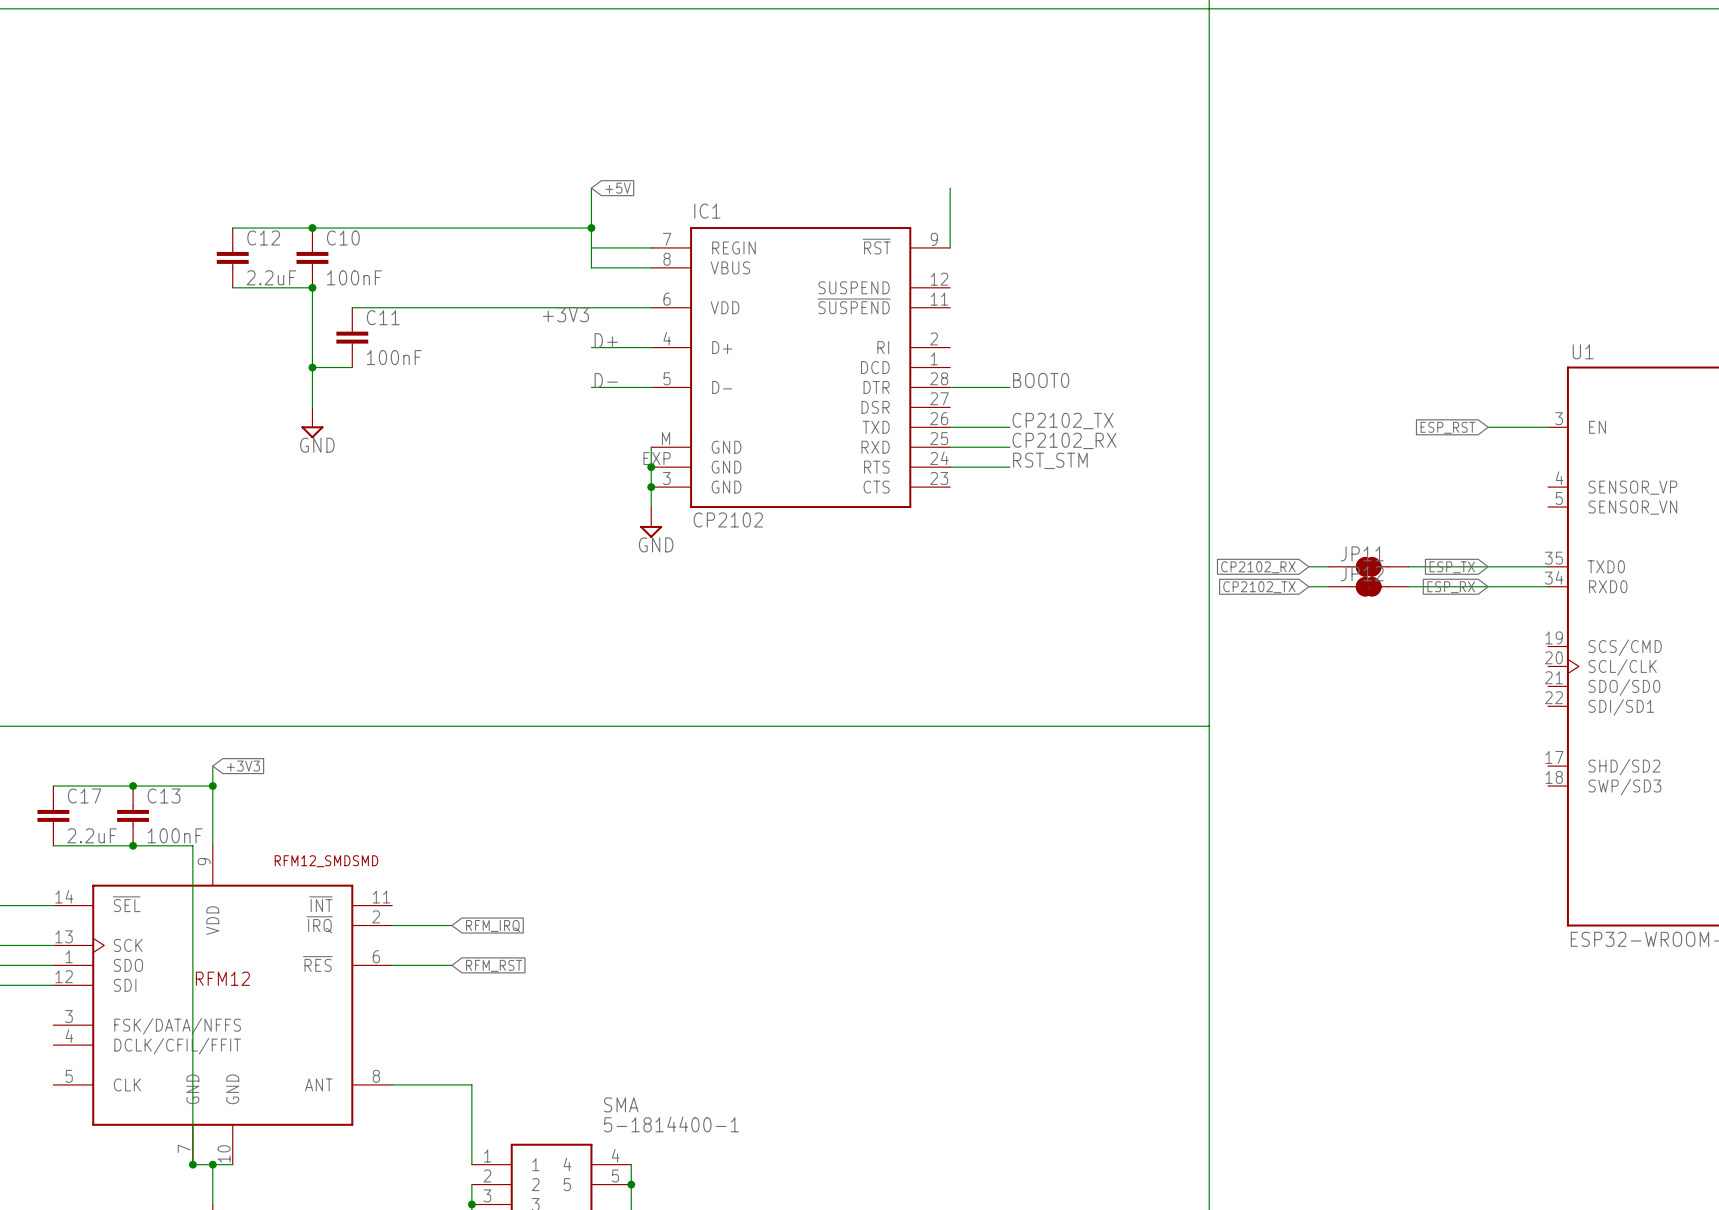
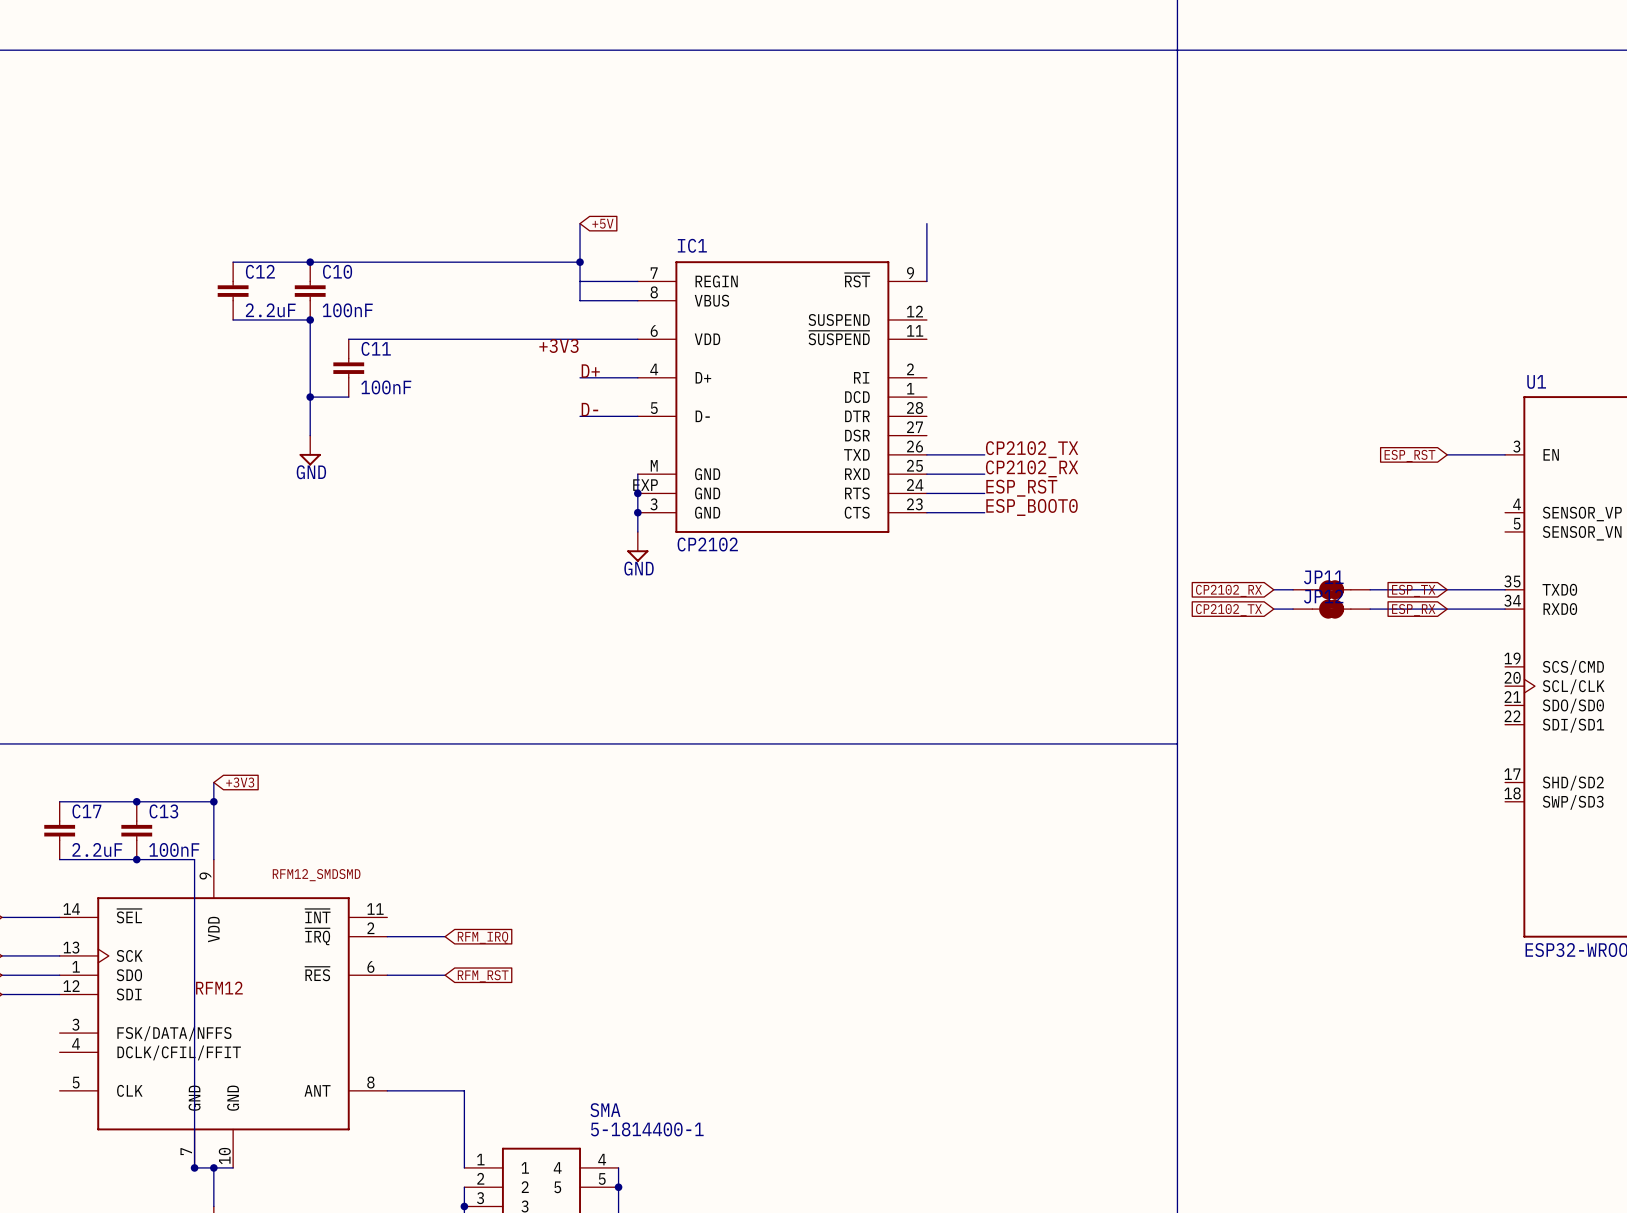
label: BOOT0 (1041, 380) -> none
wire: (950, 387) (1009, 387) -> (926, 512) (984, 512)
label: RST_STM (1050, 460) -> ESP_RST (1021, 488)
label: none -> ESP_BOOT0 (1031, 507)

